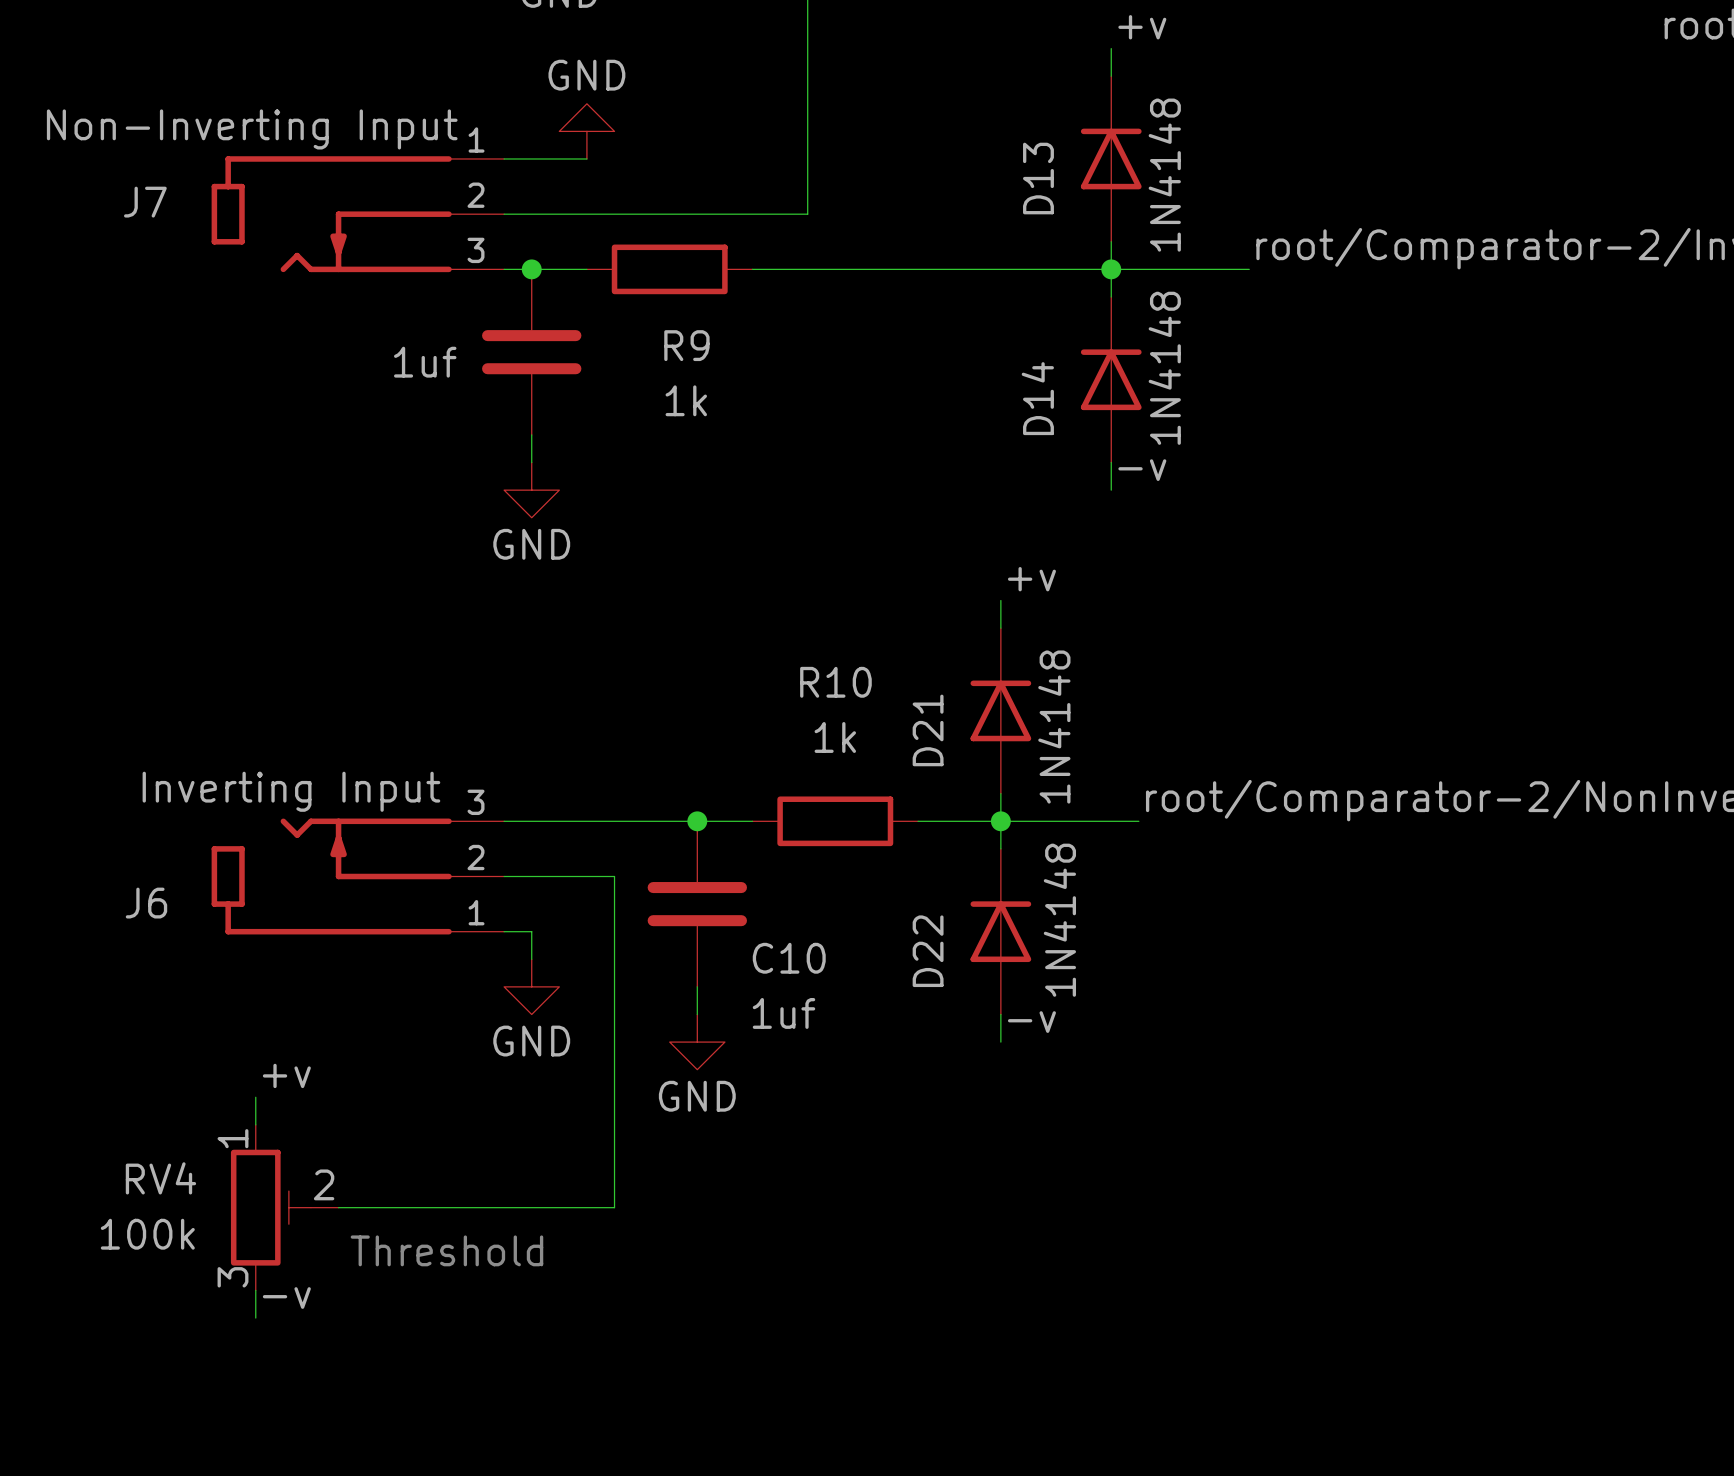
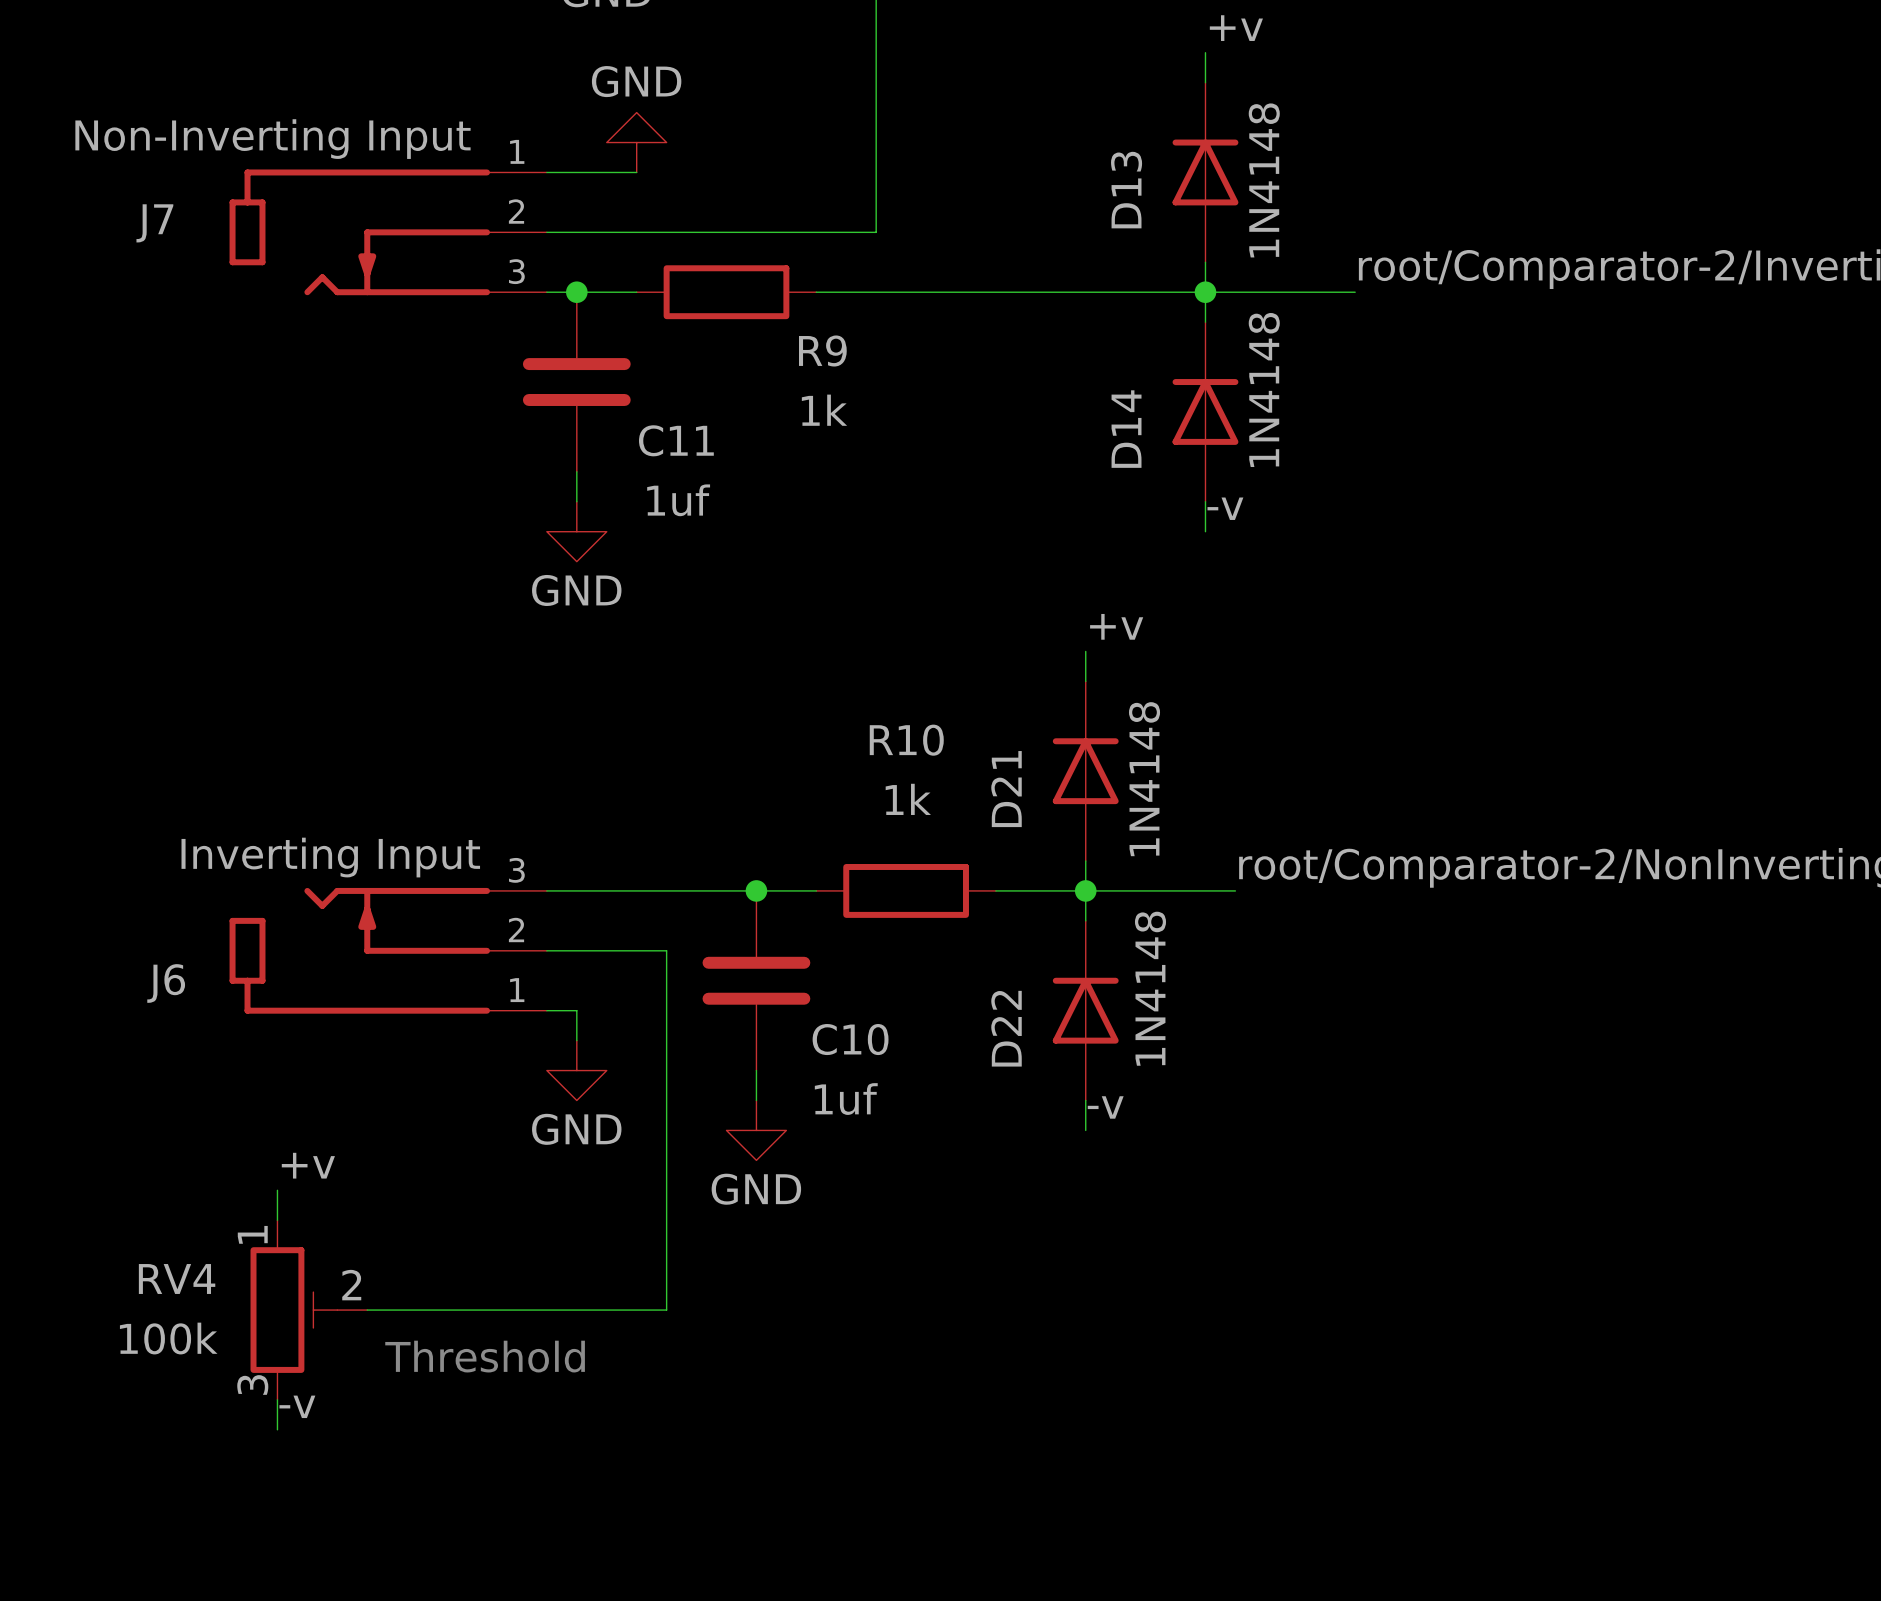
R9 name position: R9 (686, 345) -> R9 (822, 350)
C11 value position: 1uf (425, 362) -> 1uf (678, 500)
R9 value position: 1k (686, 400) -> 1k (824, 410)
C11 name: none -> C11 (676, 440)

